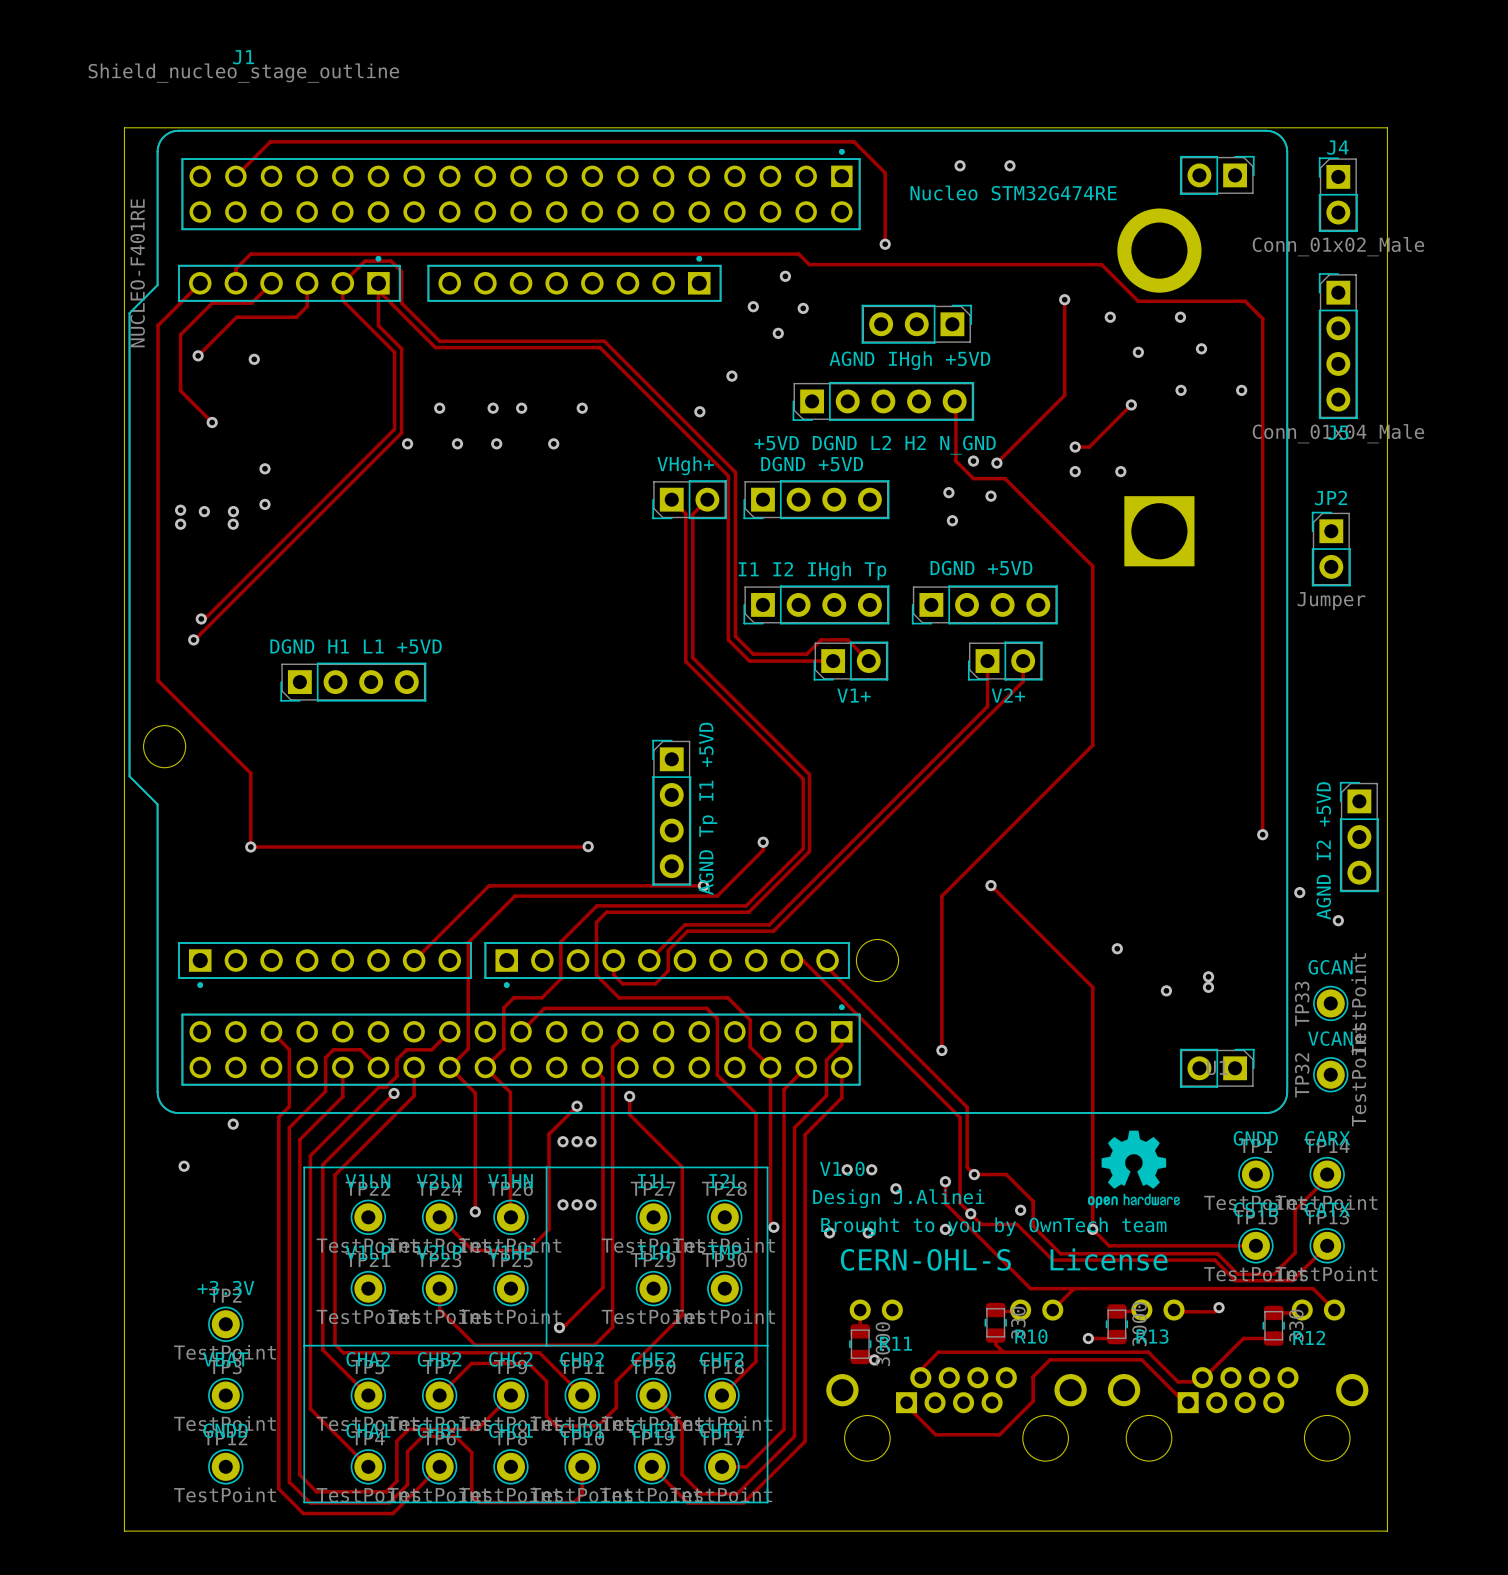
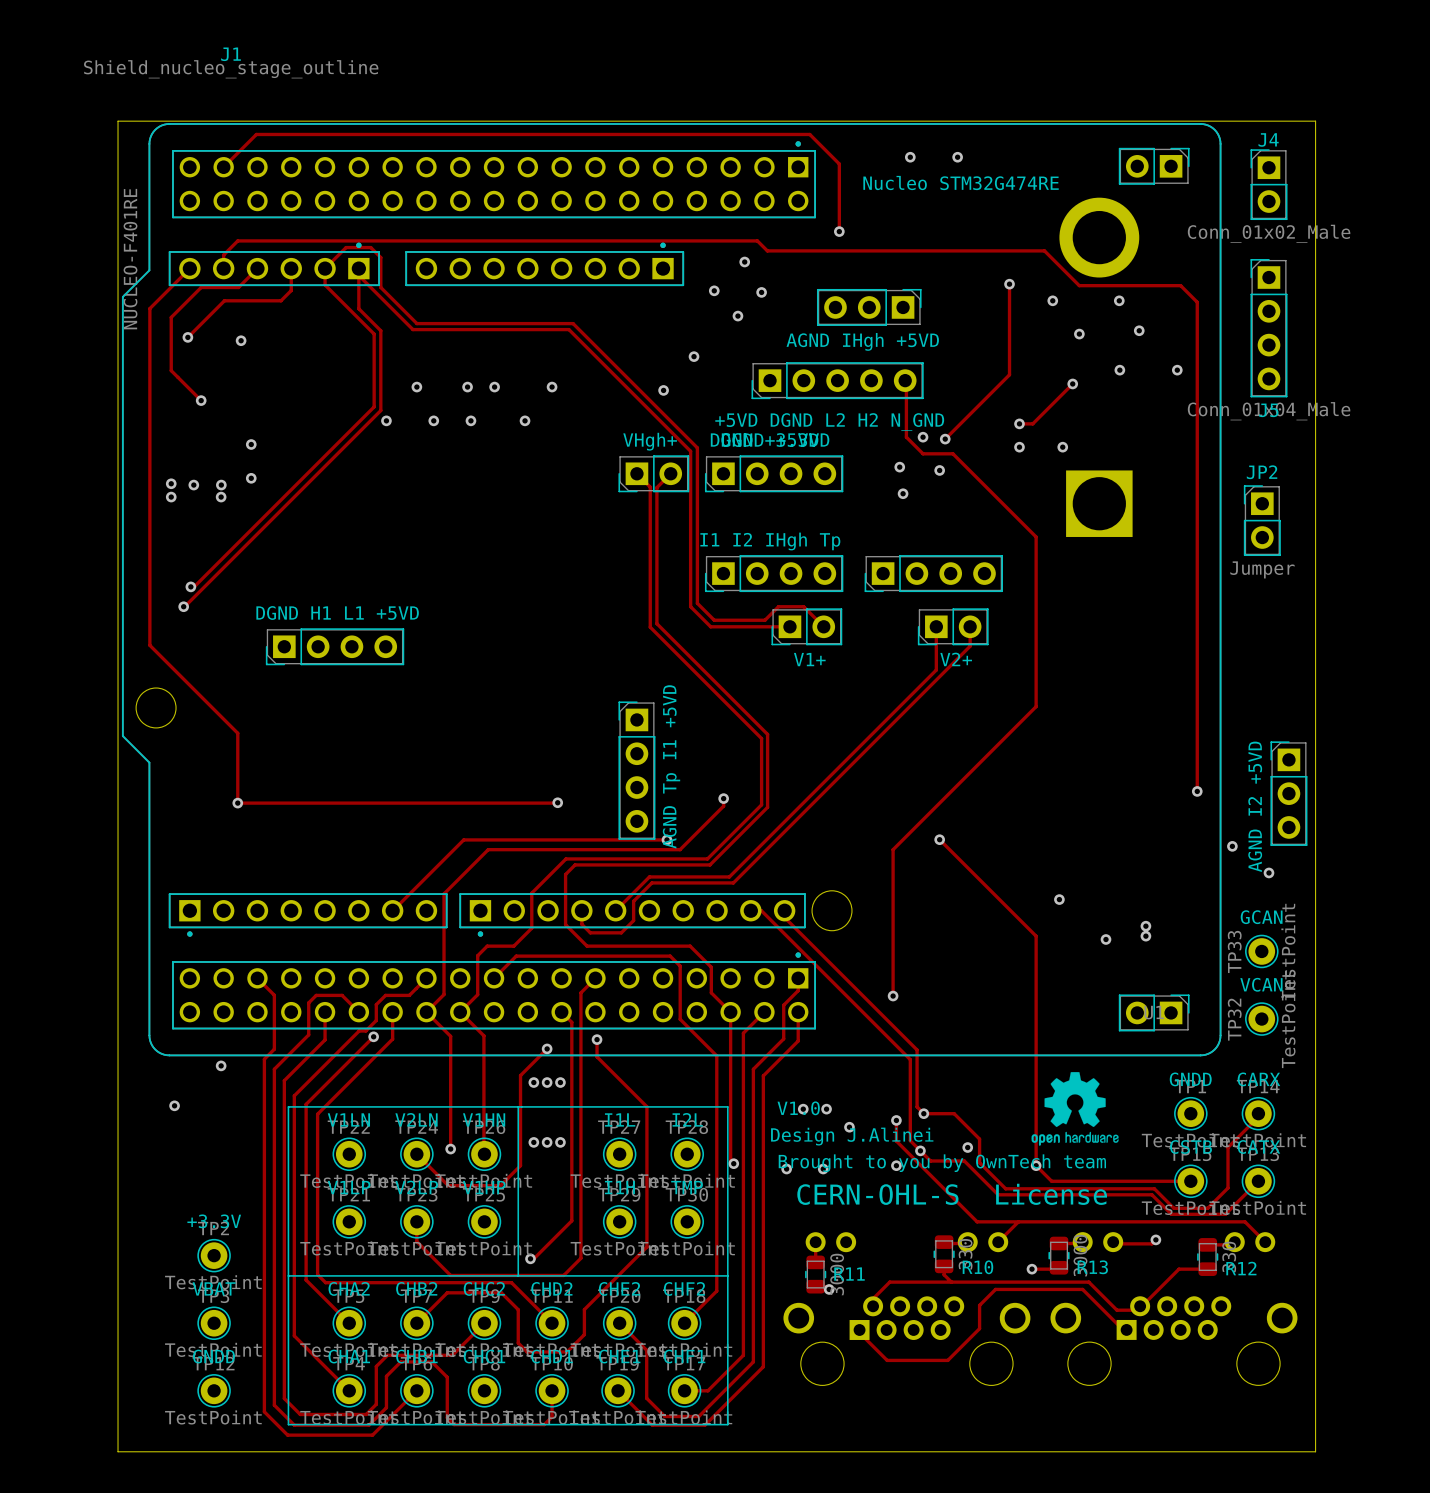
J1 footprint: [280, 304, 1379, 893] -> [265, 288, 1308, 846]

